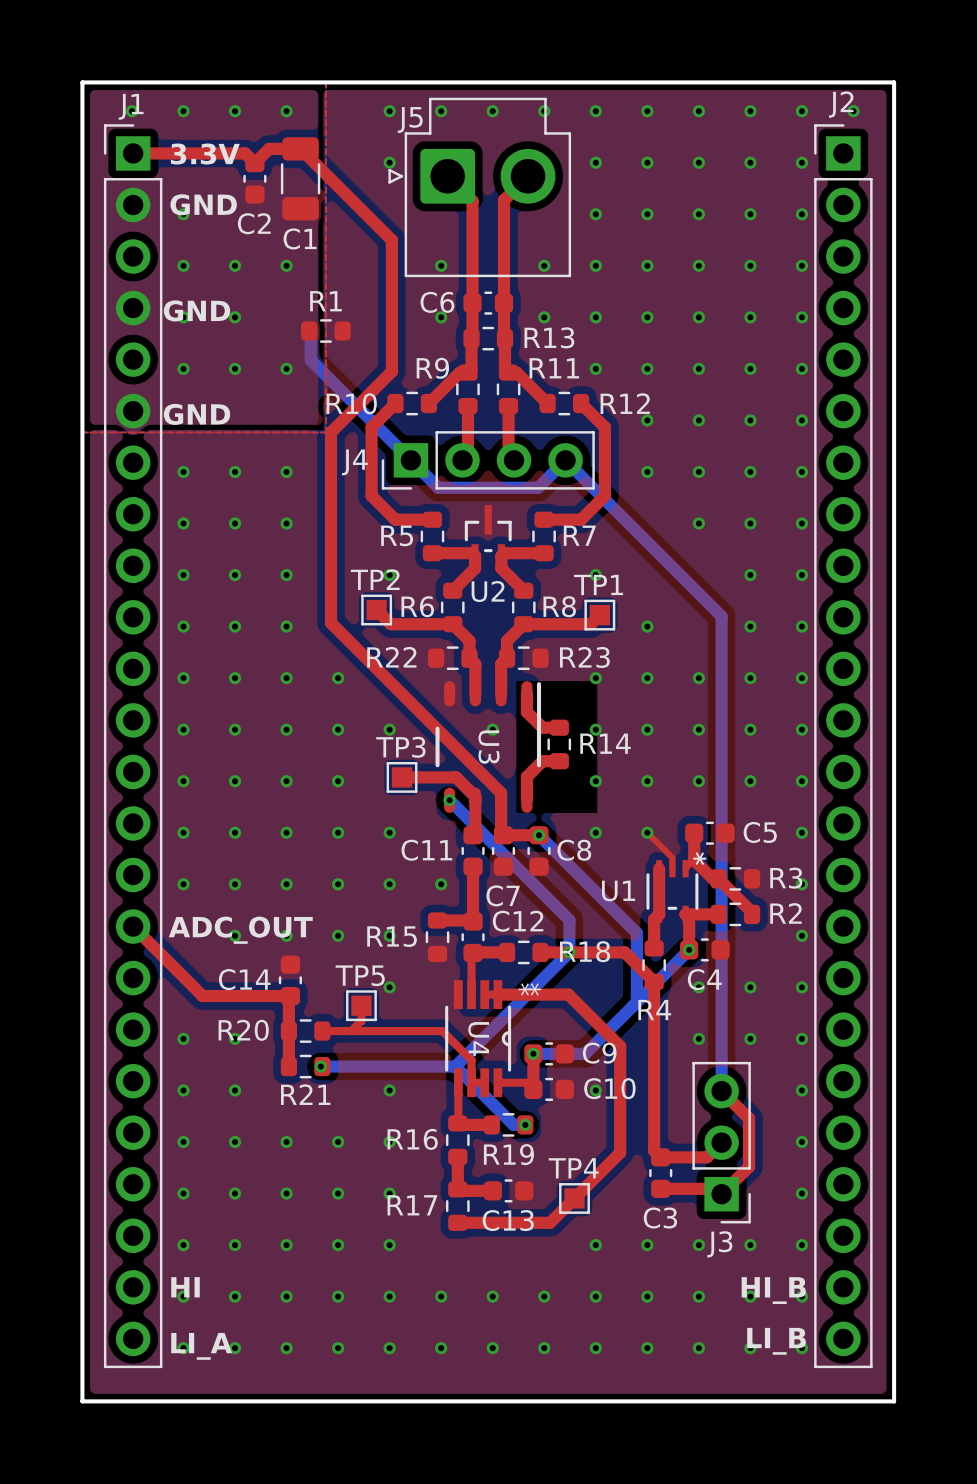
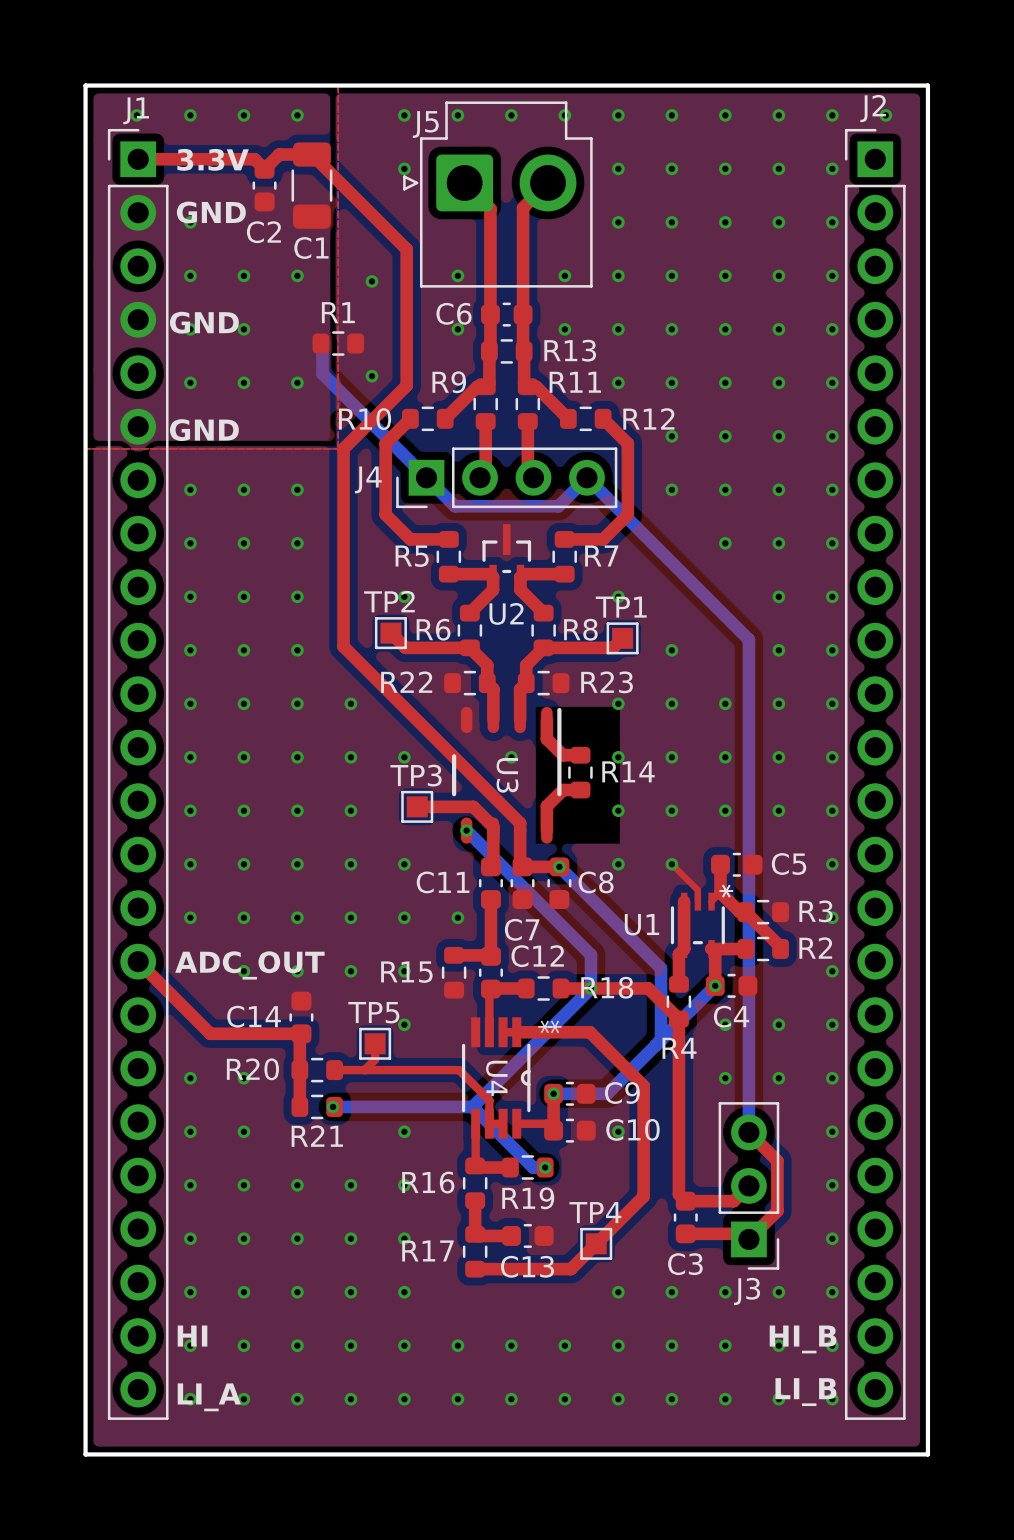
via: none -> (371, 281)
via: none -> (371, 376)

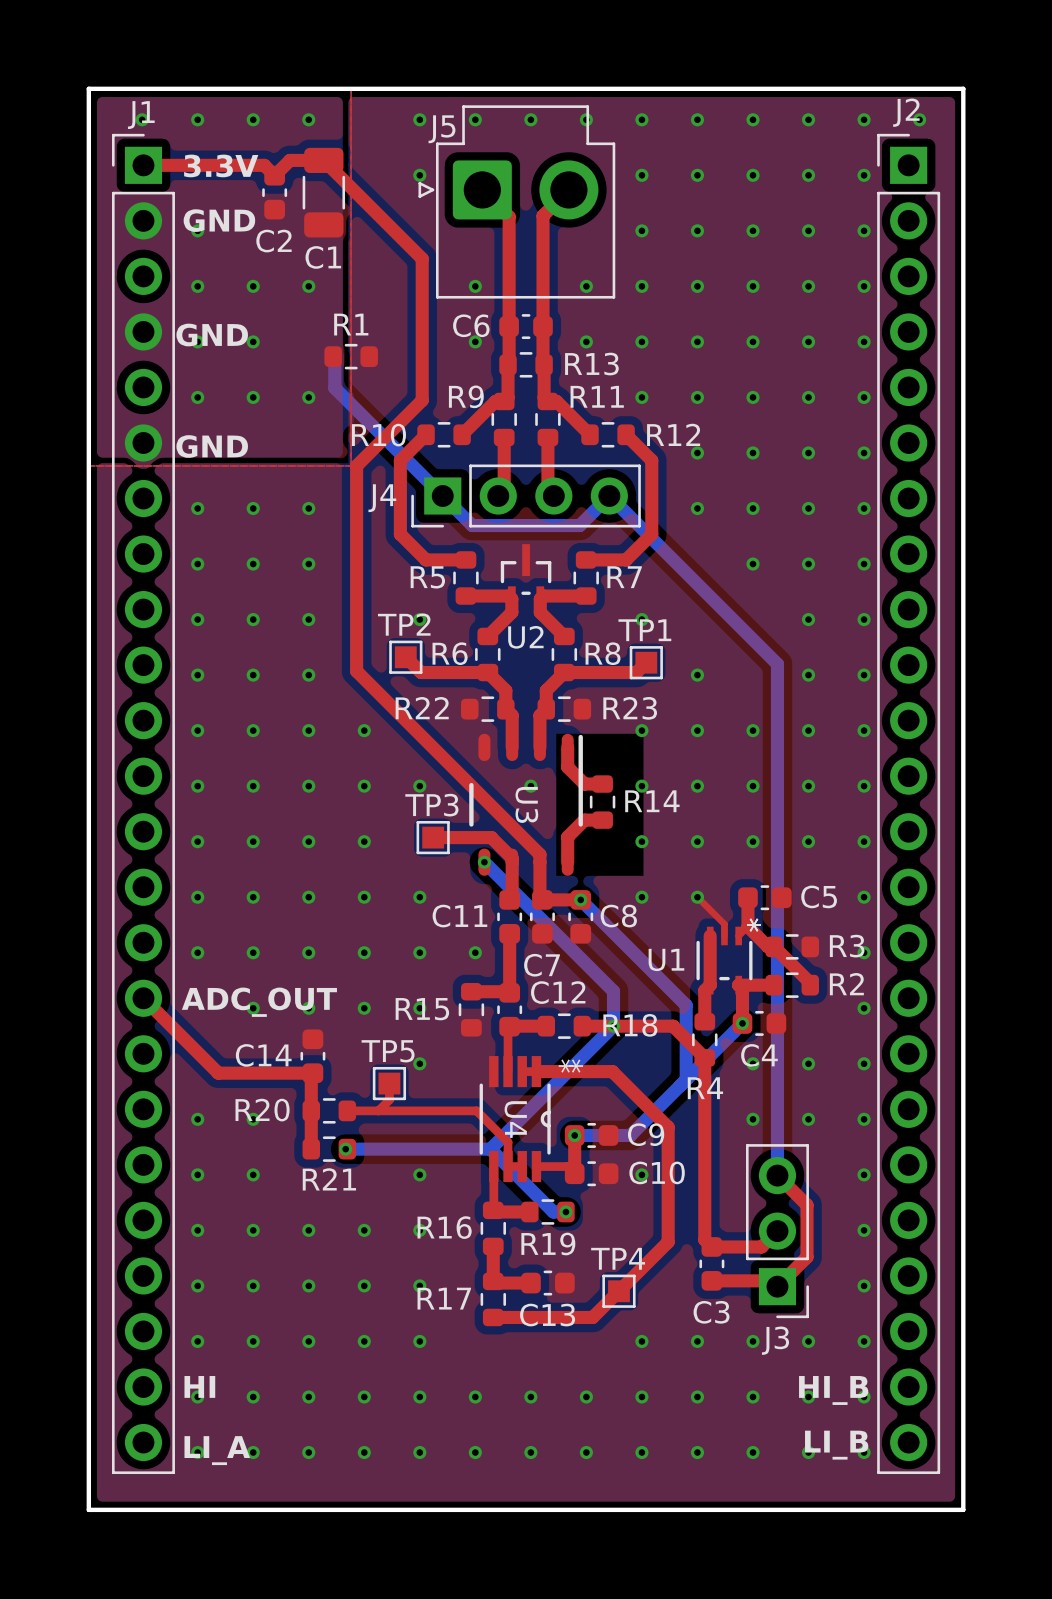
via: (371, 281) -> none
via: (371, 376) -> none

